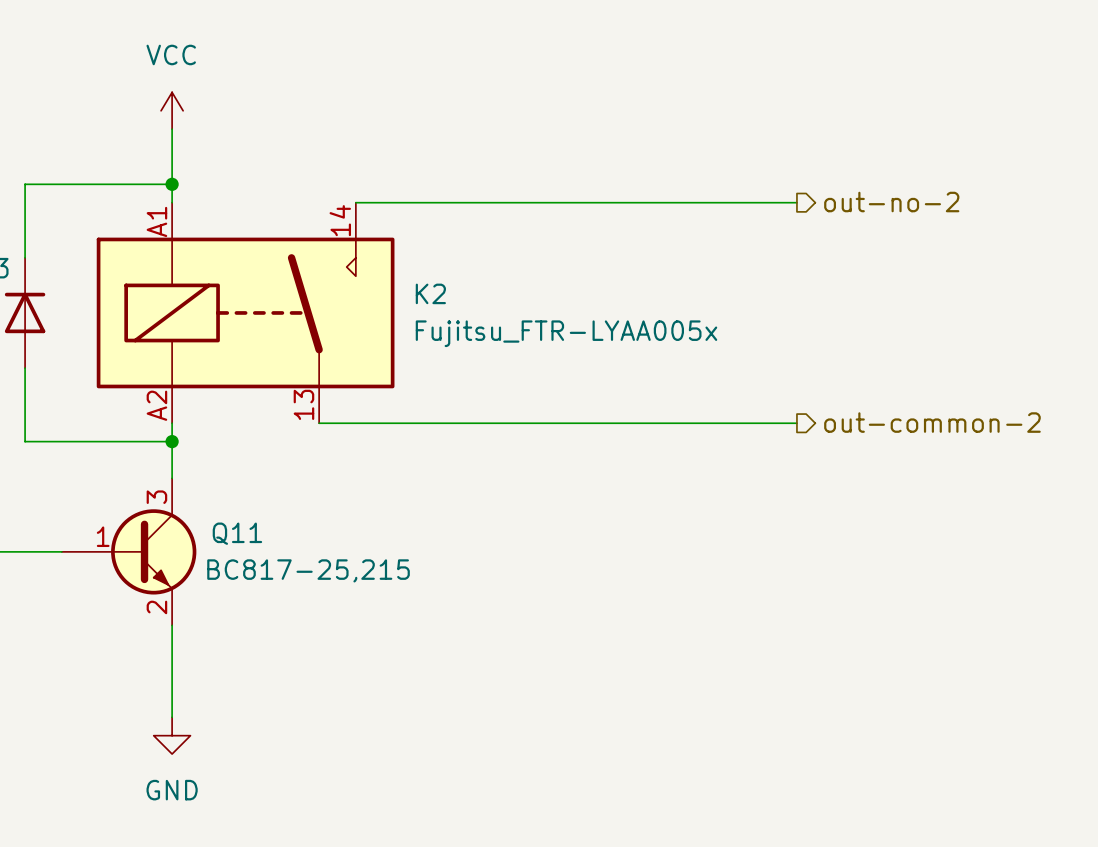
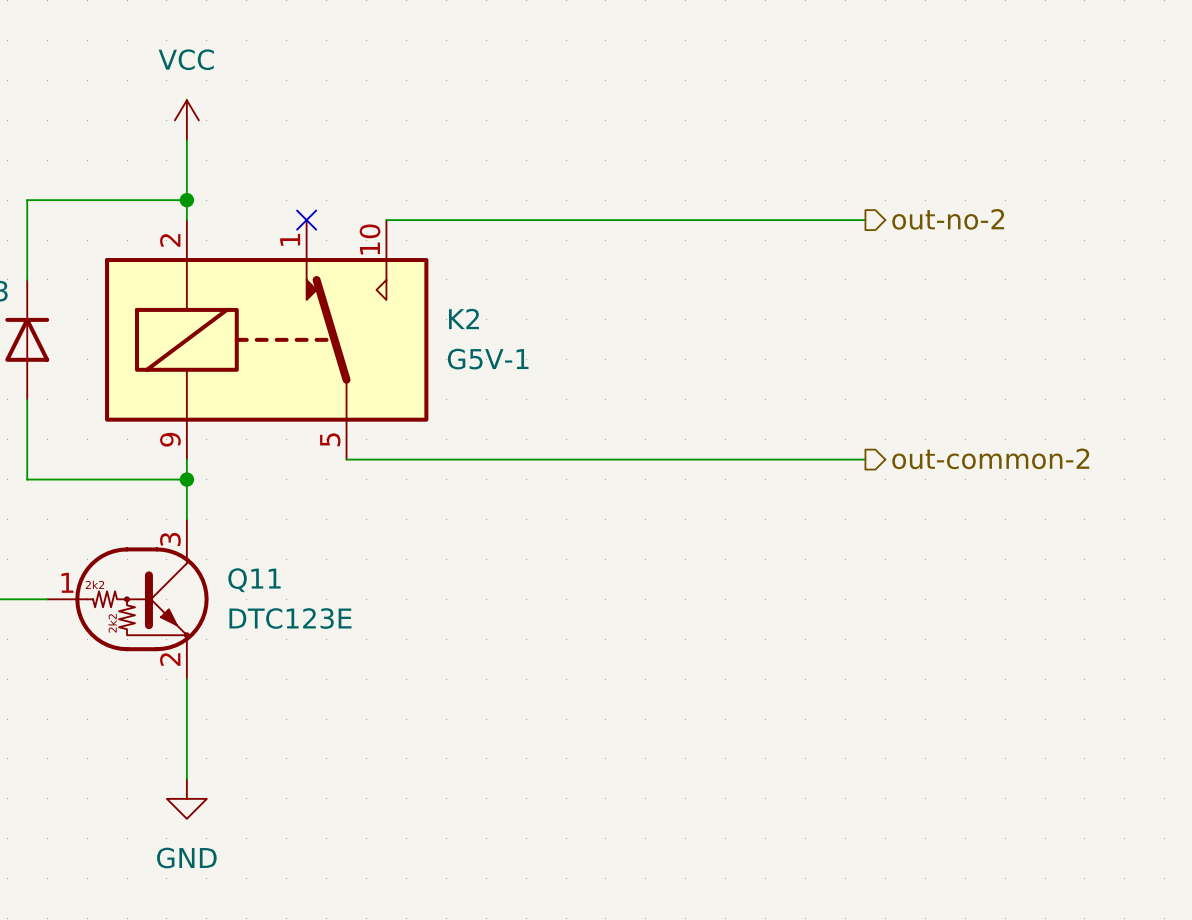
K2 symbol: [96, 202, 395, 424] -> [105, 220, 429, 460]
no-connect mark: none -> (306, 220)
K2 value: Fujitsu_FTR-LYAA005x (566, 333) -> G5V-1 (488, 359)
Q11 symbol: [61, 478, 197, 626] -> [47, 519, 209, 680]
Q11 value: none -> DTC123E (290, 618)
Q11 text: BC817-25,215 (308, 570) -> none

